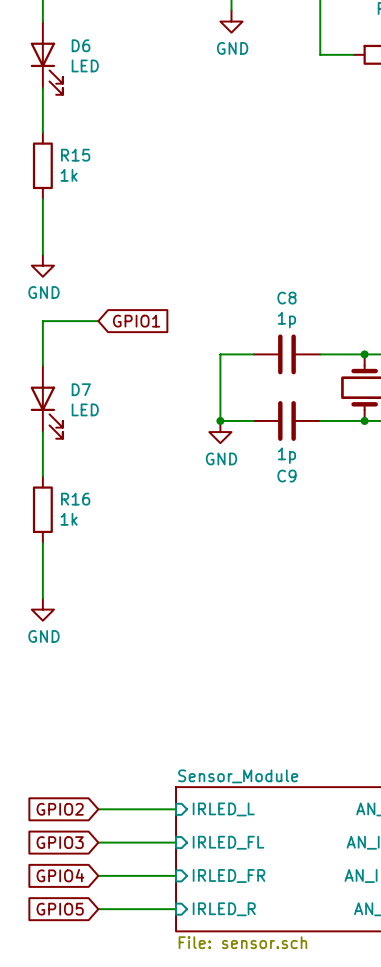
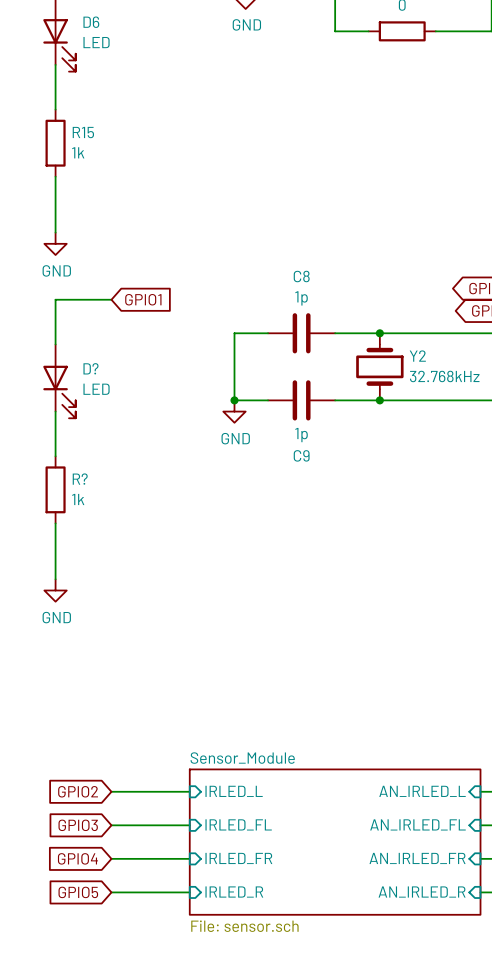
D7 name: D7 (81, 389) -> D? (90, 368)
R16 name: R16 (75, 499) -> R? (80, 479)

